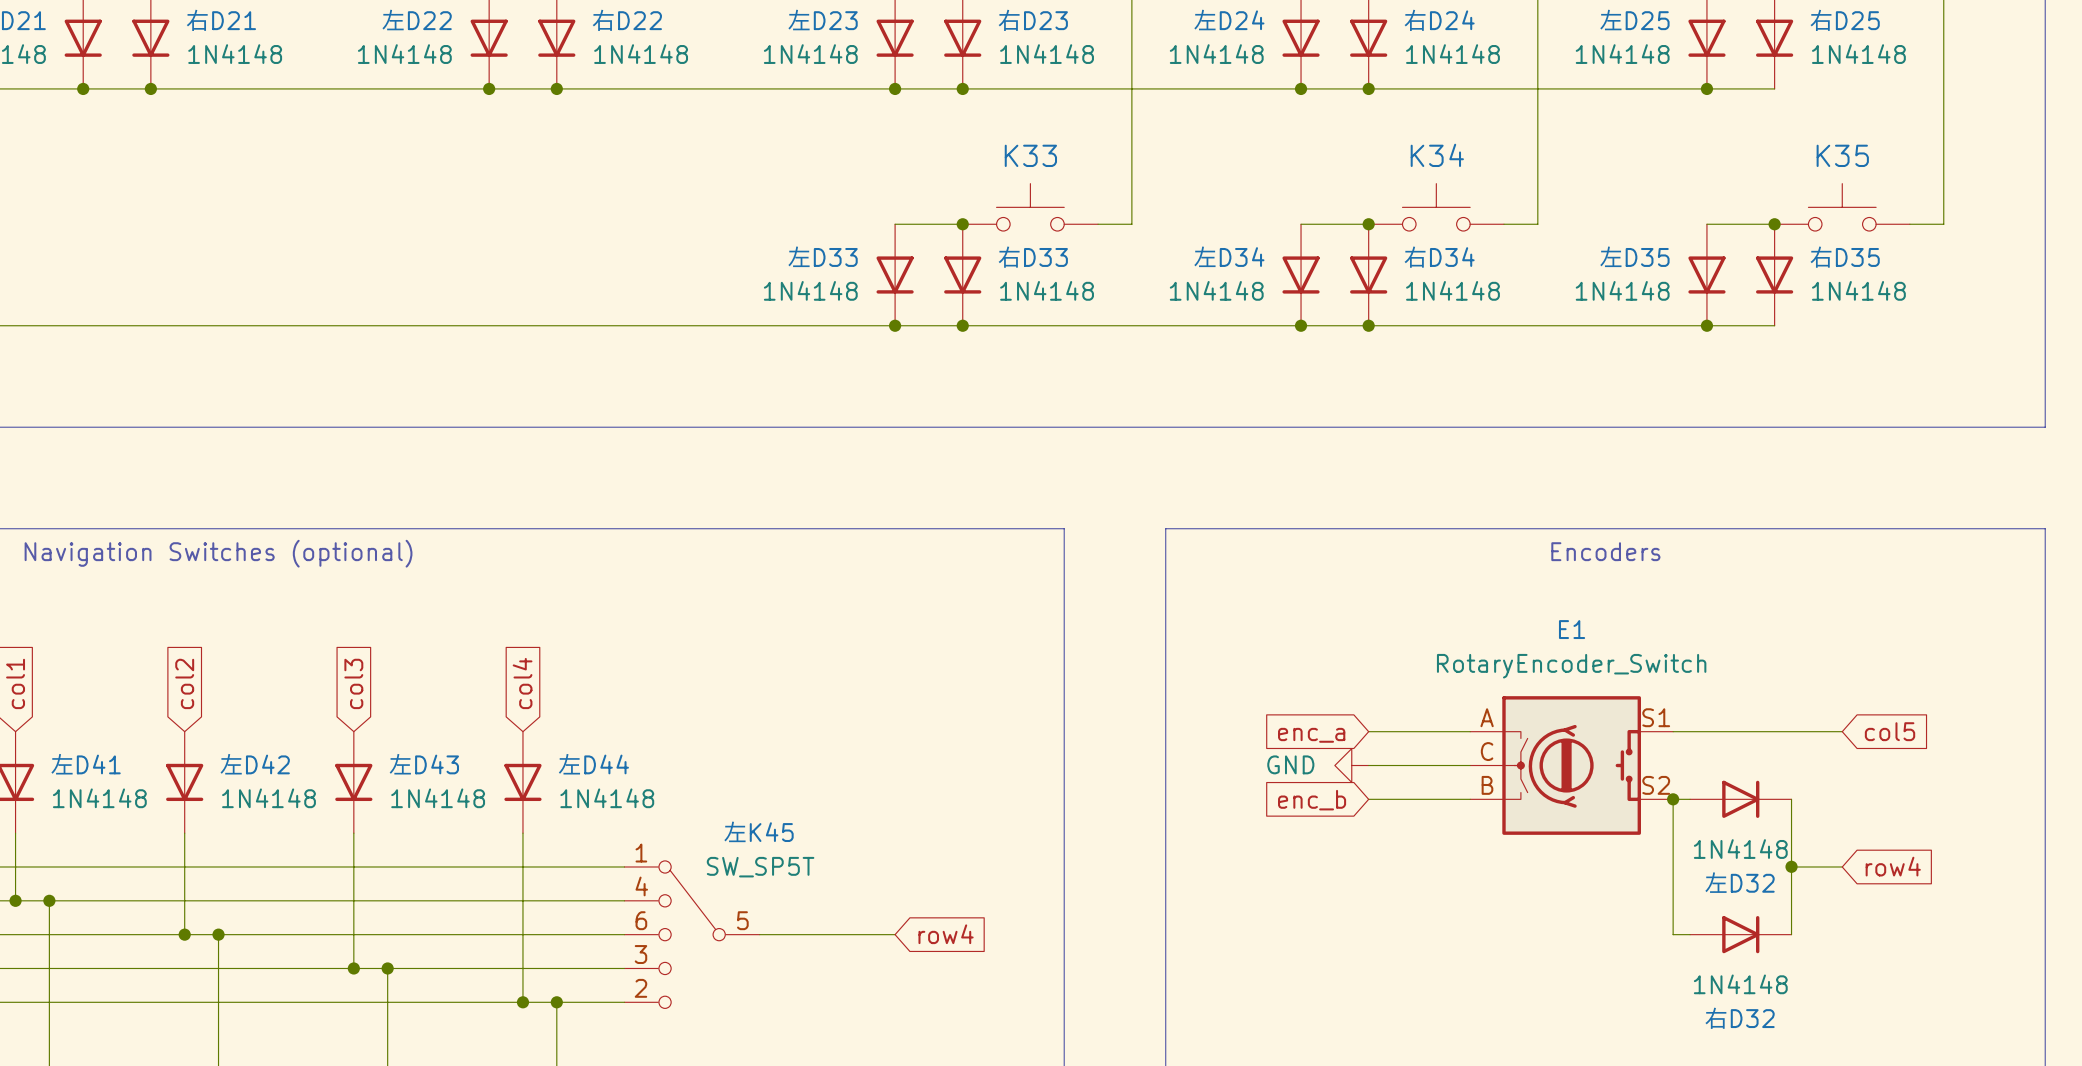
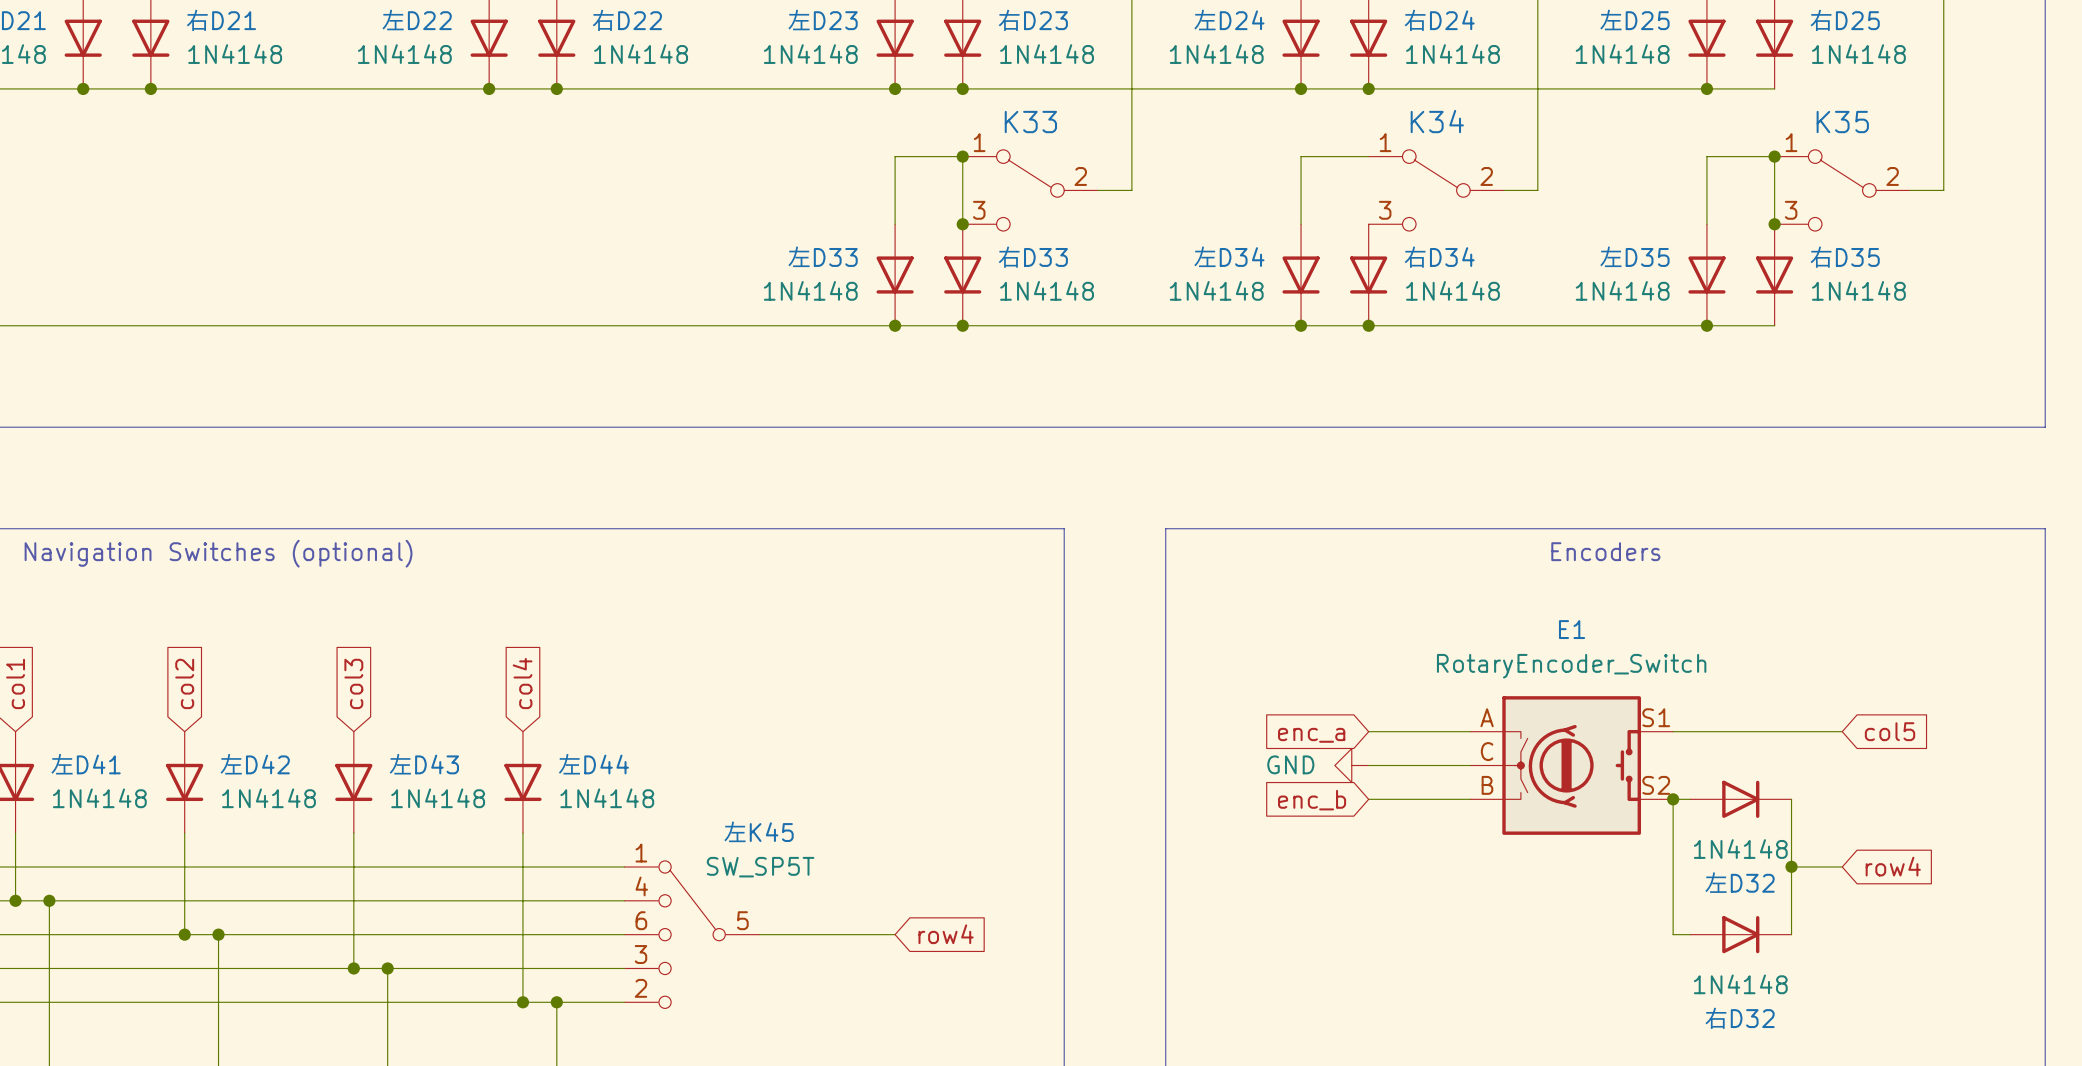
junction: none -> (962, 156)
junction: none -> (1774, 156)
K33 symbol: [962, 183, 1099, 232] -> [962, 149, 1099, 232]
K34 symbol: [1368, 183, 1504, 232] -> [1368, 149, 1504, 232]
K35 symbol: [1774, 183, 1910, 232] -> [1774, 149, 1910, 232]
wire: (1131, 190) (1131, 224) (1098, 224) -> (1131, 190) (1098, 190)
wire: (1537, 190) (1537, 224) (1503, 224) -> (1537, 190) (1503, 190)
wire: (1943, 190) (1943, 224) (1909, 224) -> (1943, 190) (1909, 190)
wire: (895, 224) (962, 224) -> (895, 224) (895, 156) (962, 156) (962, 224)
wire: (1301, 224) (1368, 224) -> (1301, 224) (1301, 156) (1368, 156)
junction: (1368, 224) -> none
wire: (1706, 224) (1774, 224) -> (1706, 224) (1706, 156) (1774, 156) (1774, 224)

